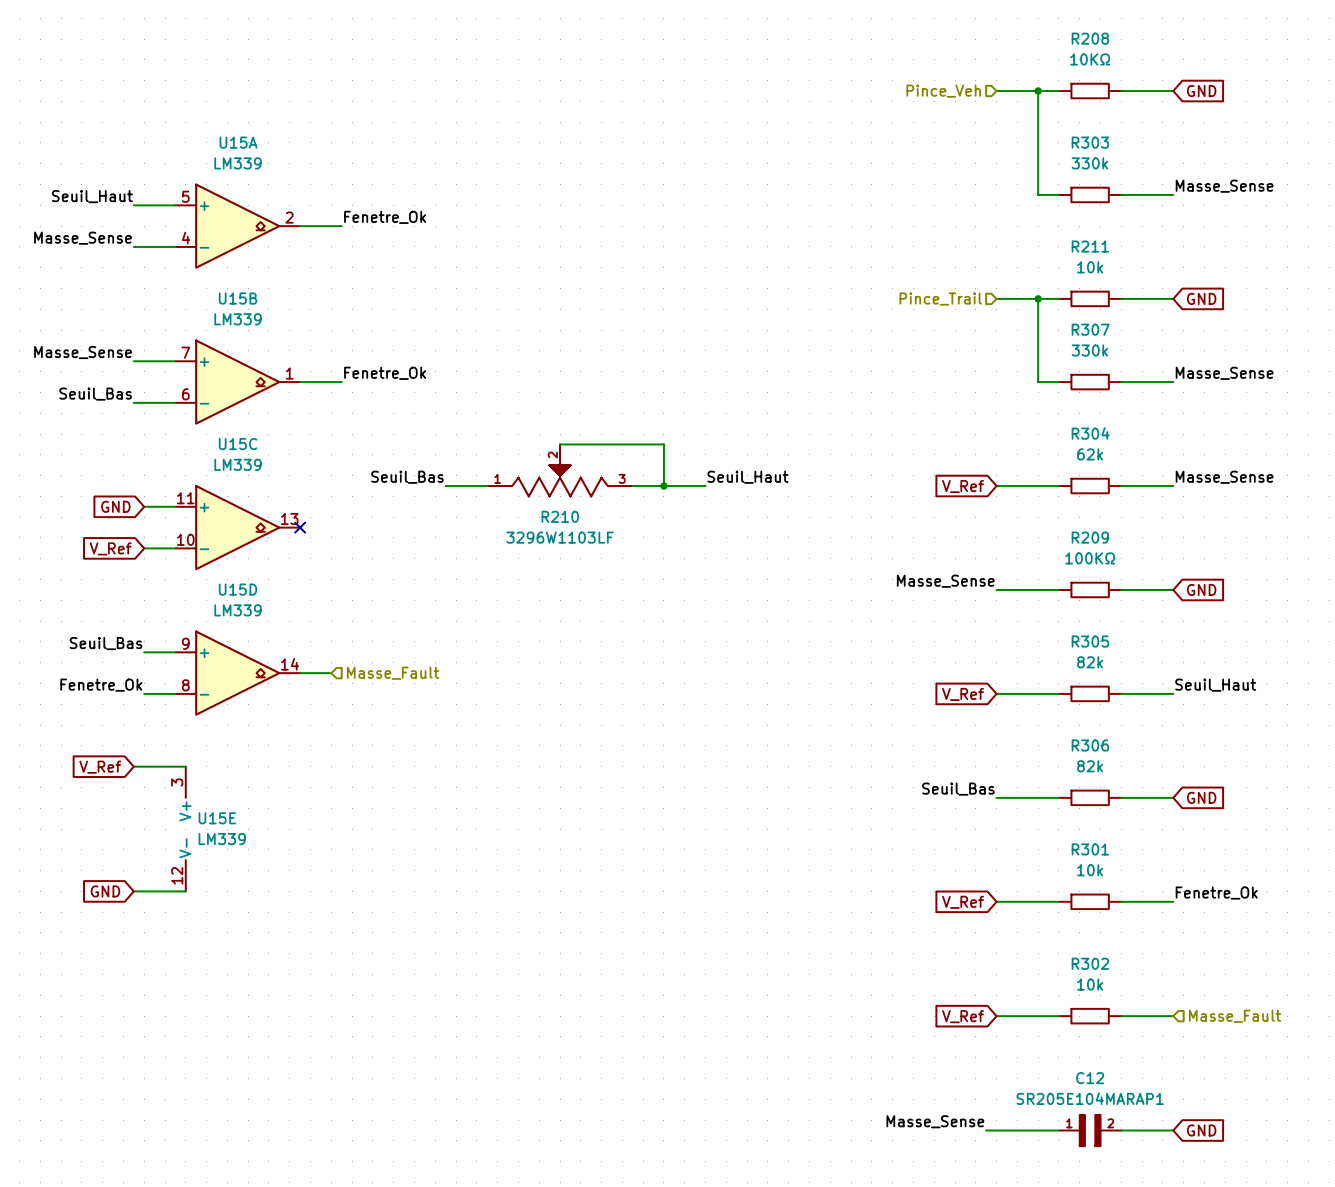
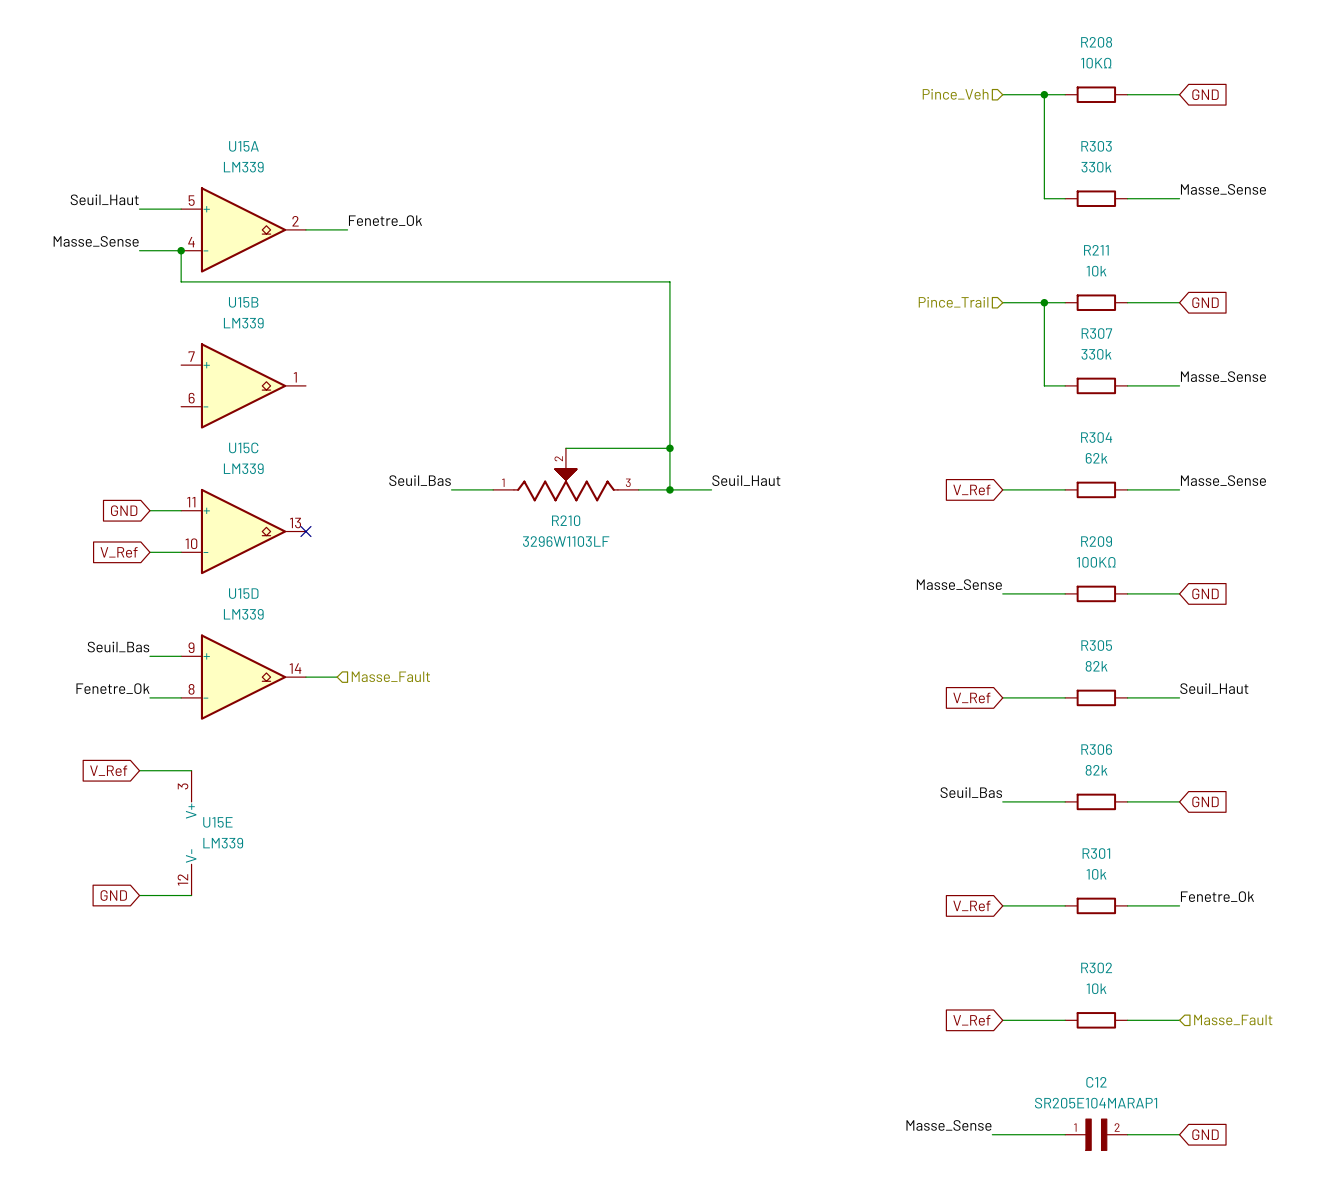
wire: none -> (181, 250) (181, 281) (669, 281) (669, 448)
junction: none -> (181, 250)
label: Masse_Sense (83, 352) -> none
wire: (133, 361) (175, 361) -> none
label: Fenetre_Ok (385, 373) -> none
wire: (300, 382) (341, 382) -> none
label: Seuil_Bas (95, 394) -> none
wire: (133, 402) (175, 402) -> none
junction: none -> (669, 448)

